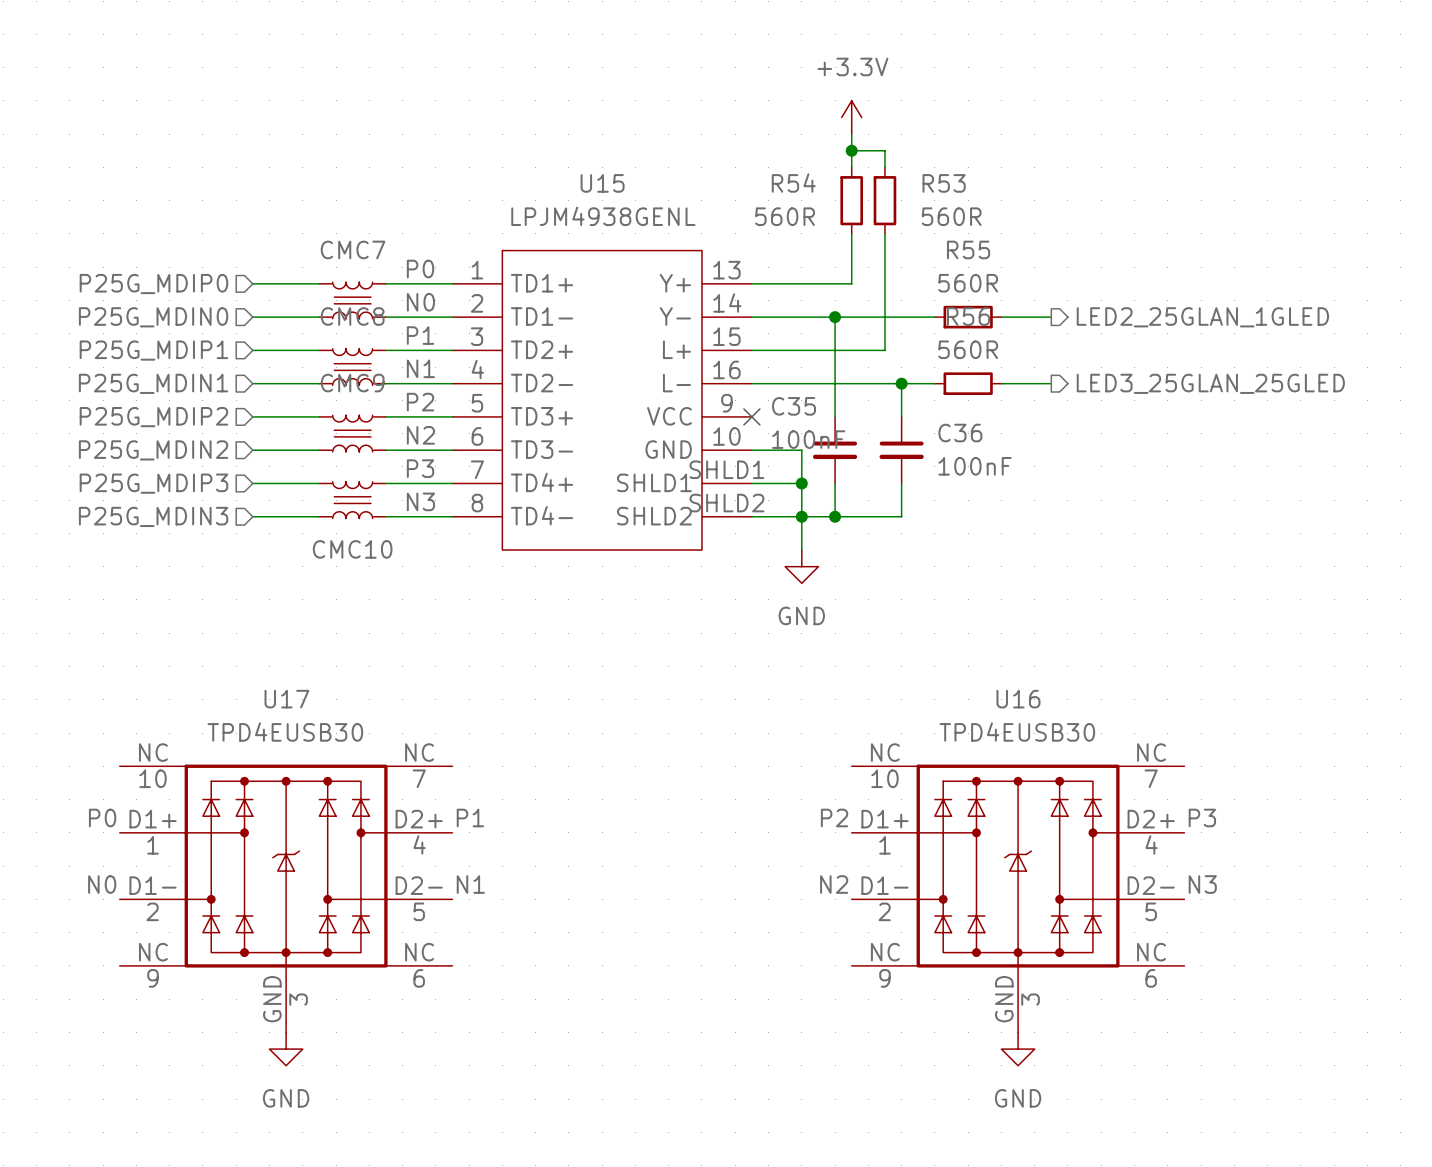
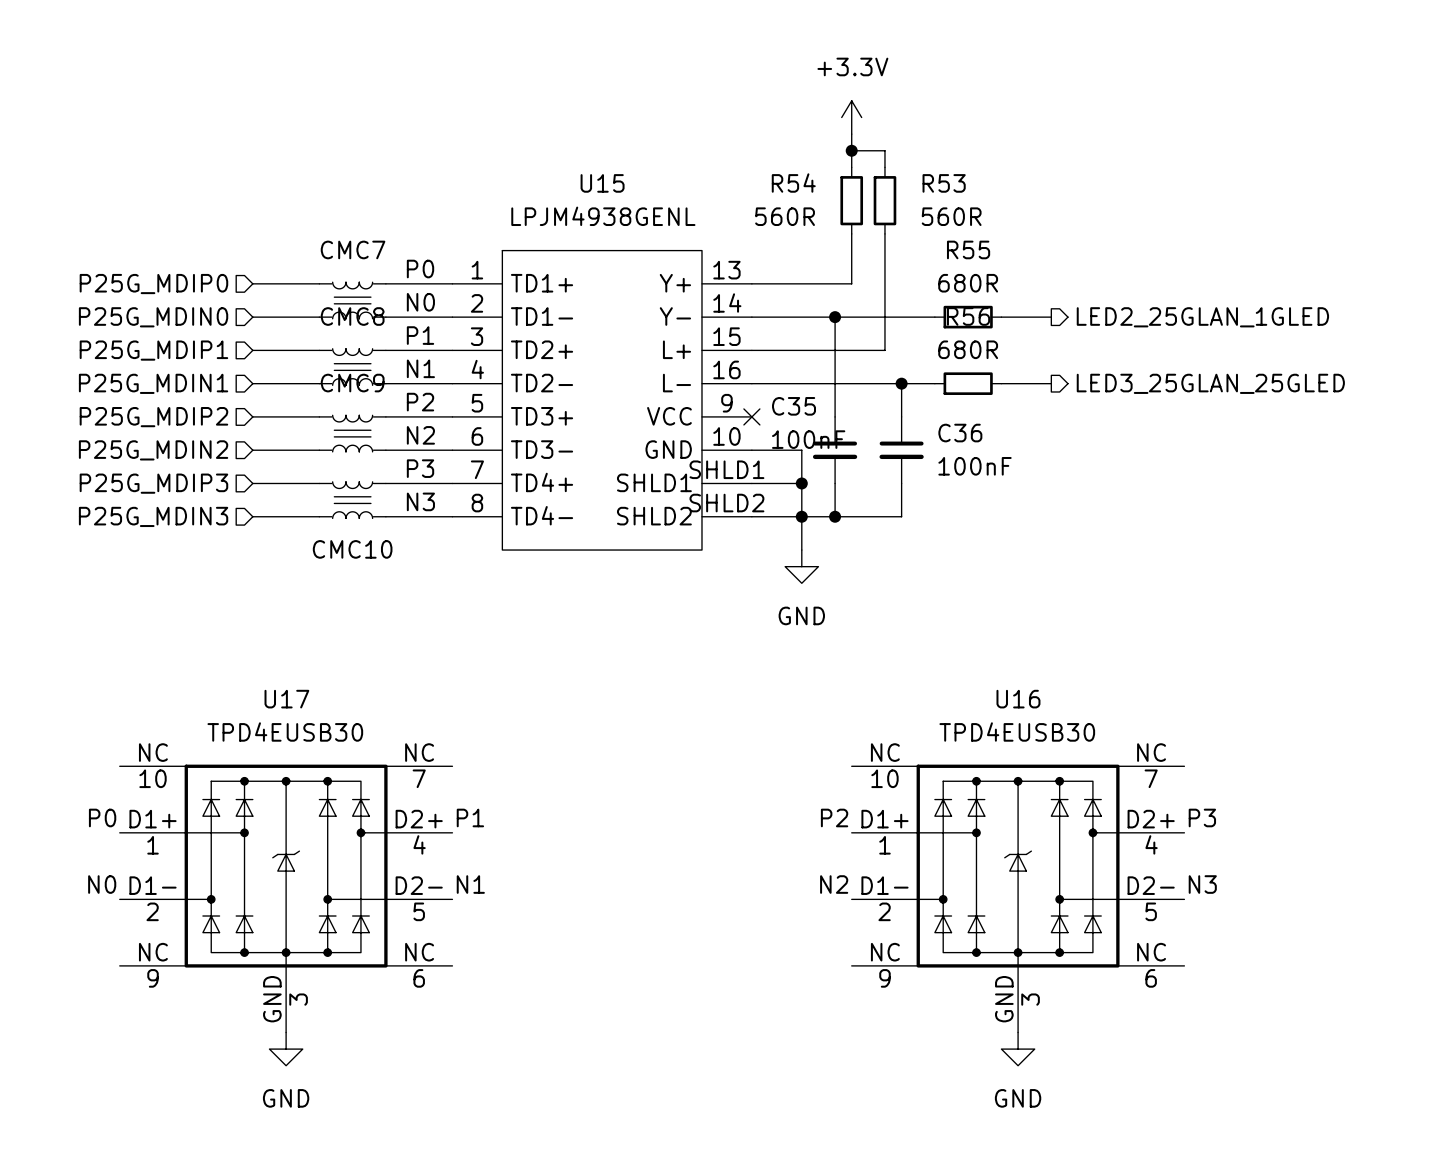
R55 value: 560R (968, 283) -> 680R (968, 283)
R56 value: 560R (968, 349) -> 680R (968, 349)

